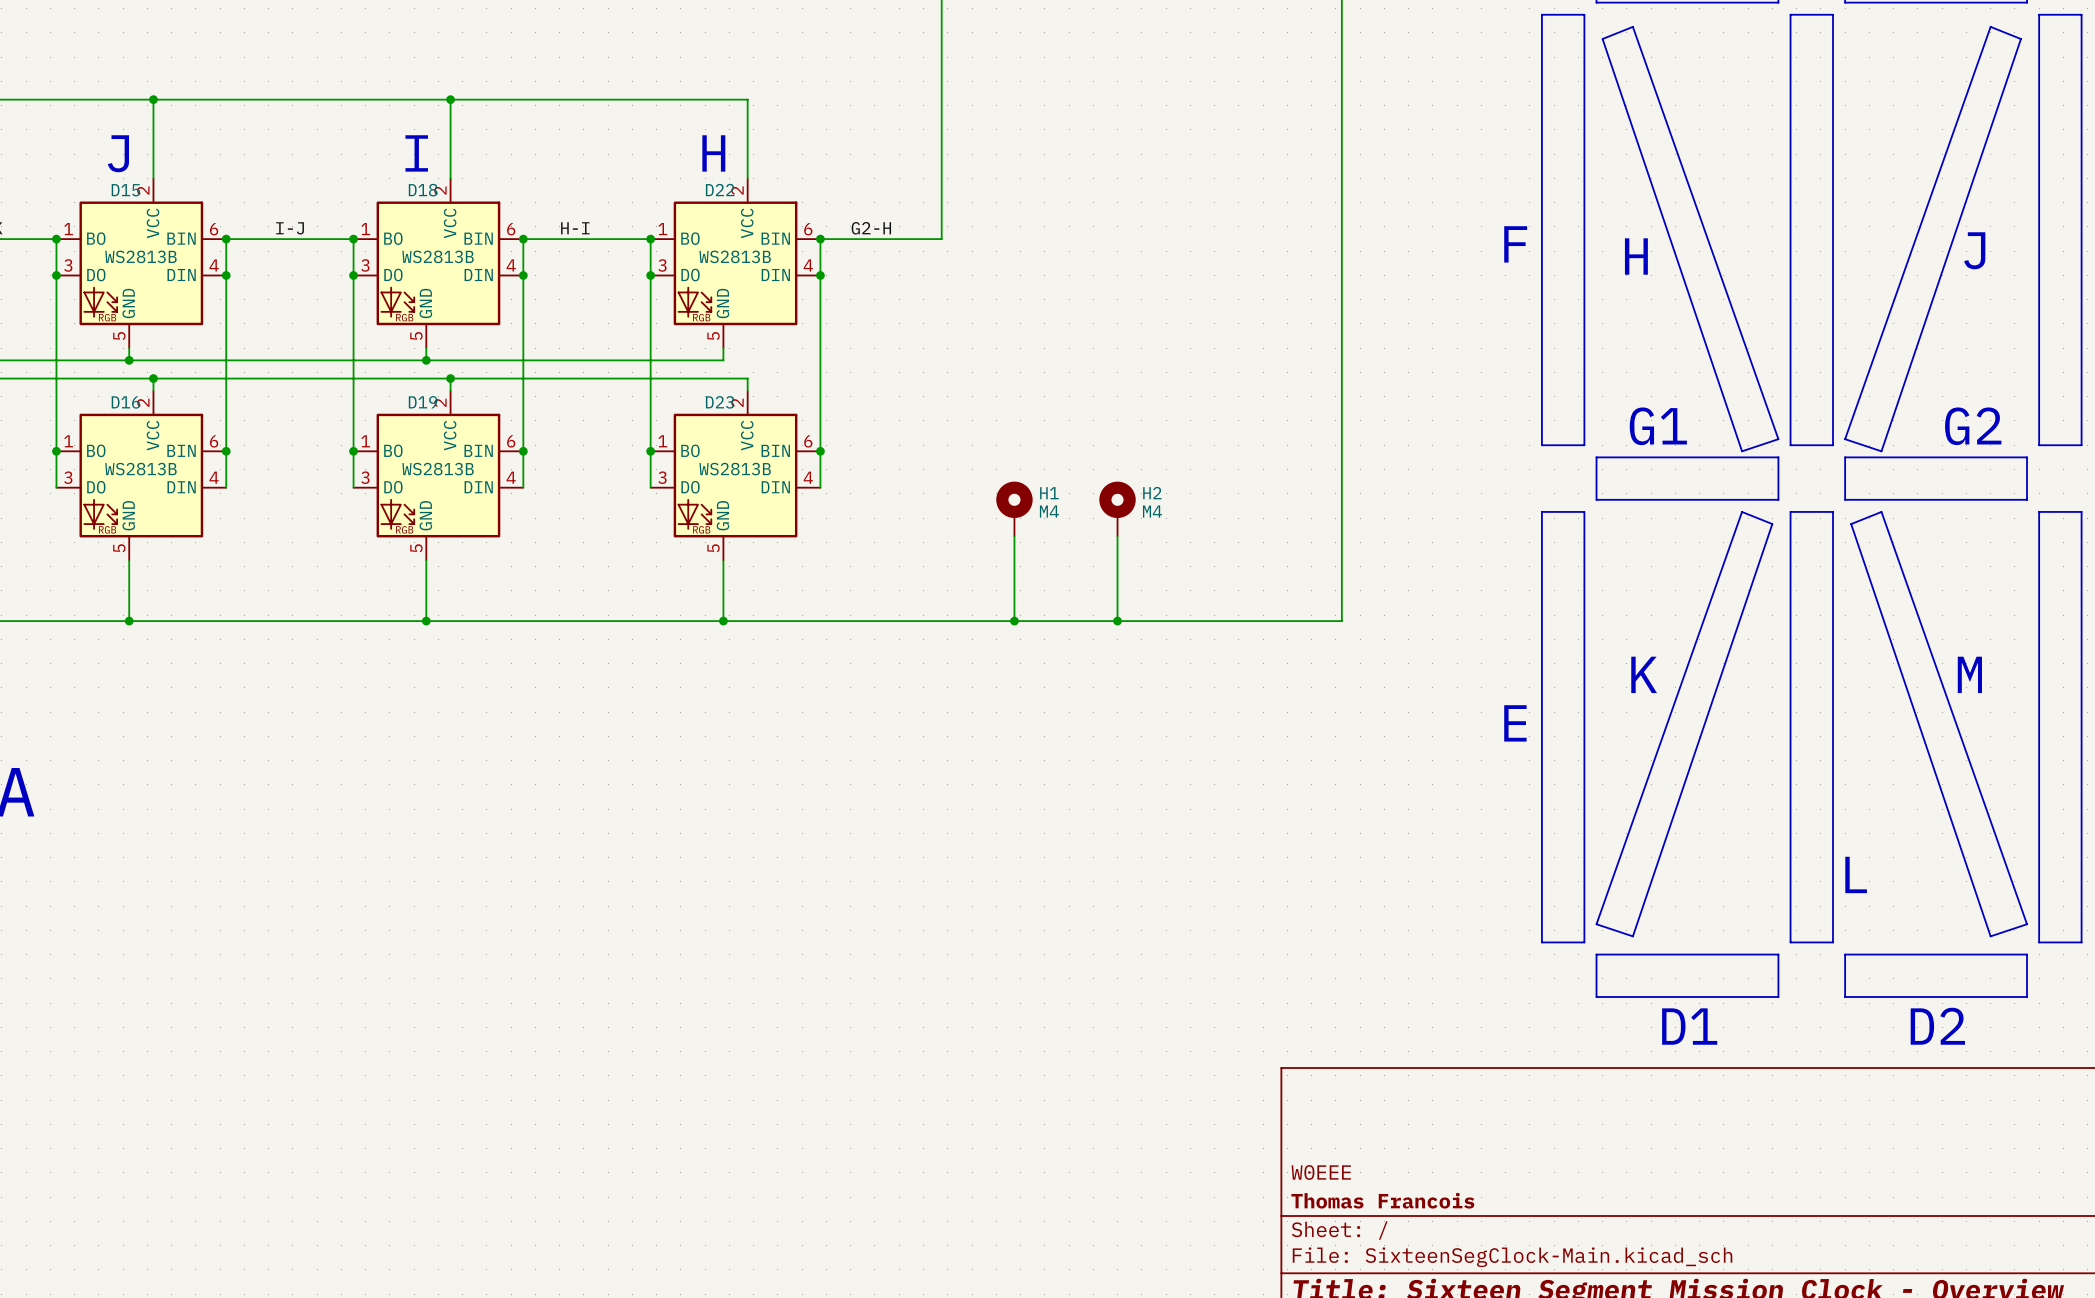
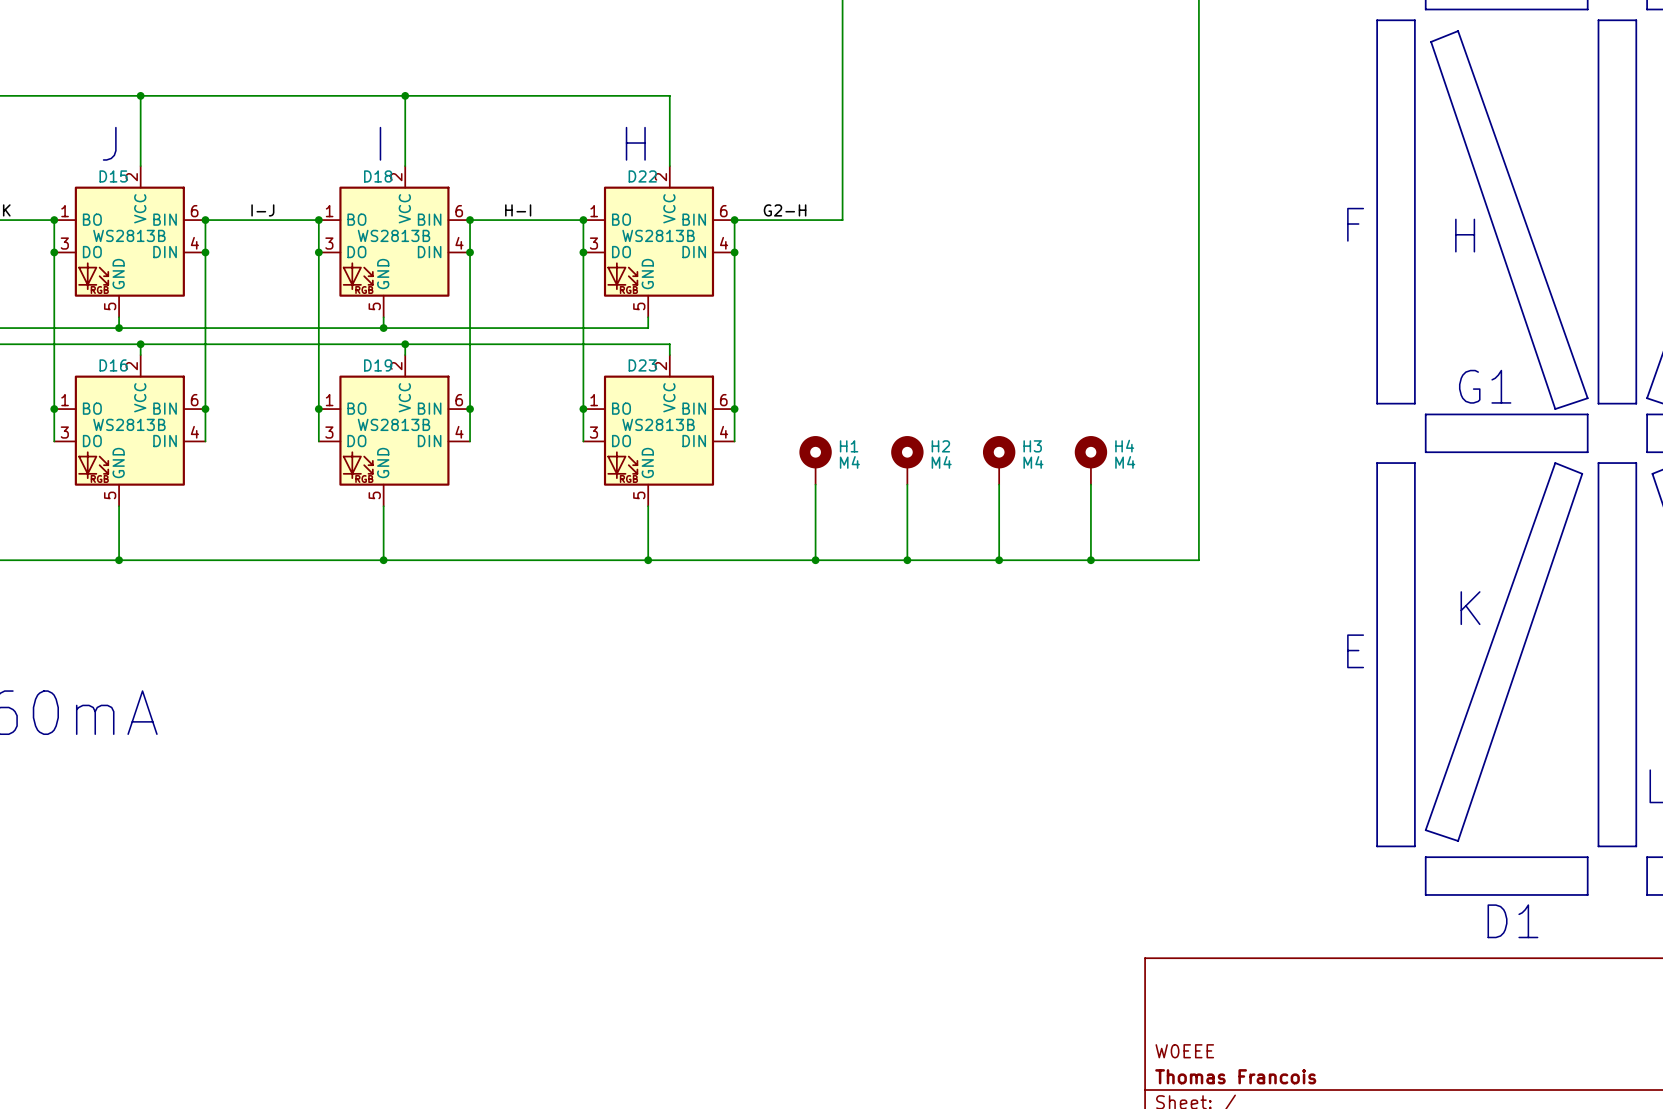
H1 name: H1 (1049, 493) -> H2 (940, 446)
H2 name: H2 (1152, 493) -> H3 (1032, 446)
H1: none -> M4 (815, 460)
H4: none -> M4 (1090, 460)
wire: none -> (815, 484) (815, 560)
wire: none -> (1090, 484) (1090, 560)
junction: none -> (815, 560)
junction: none -> (1090, 560)

